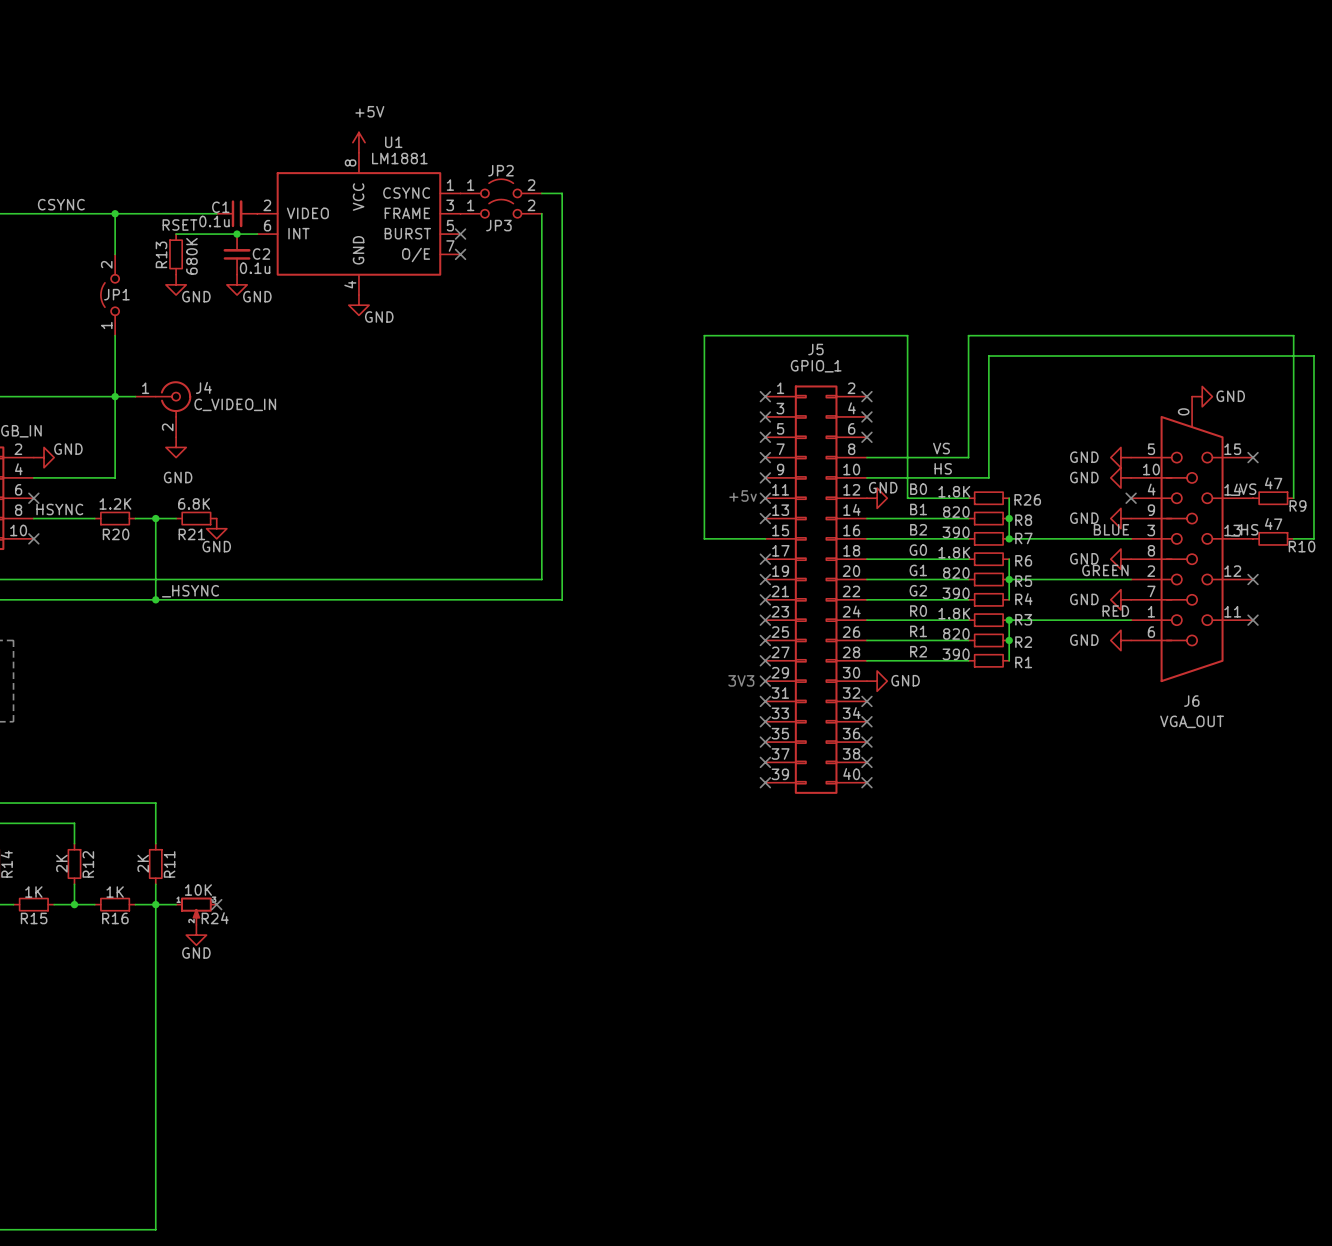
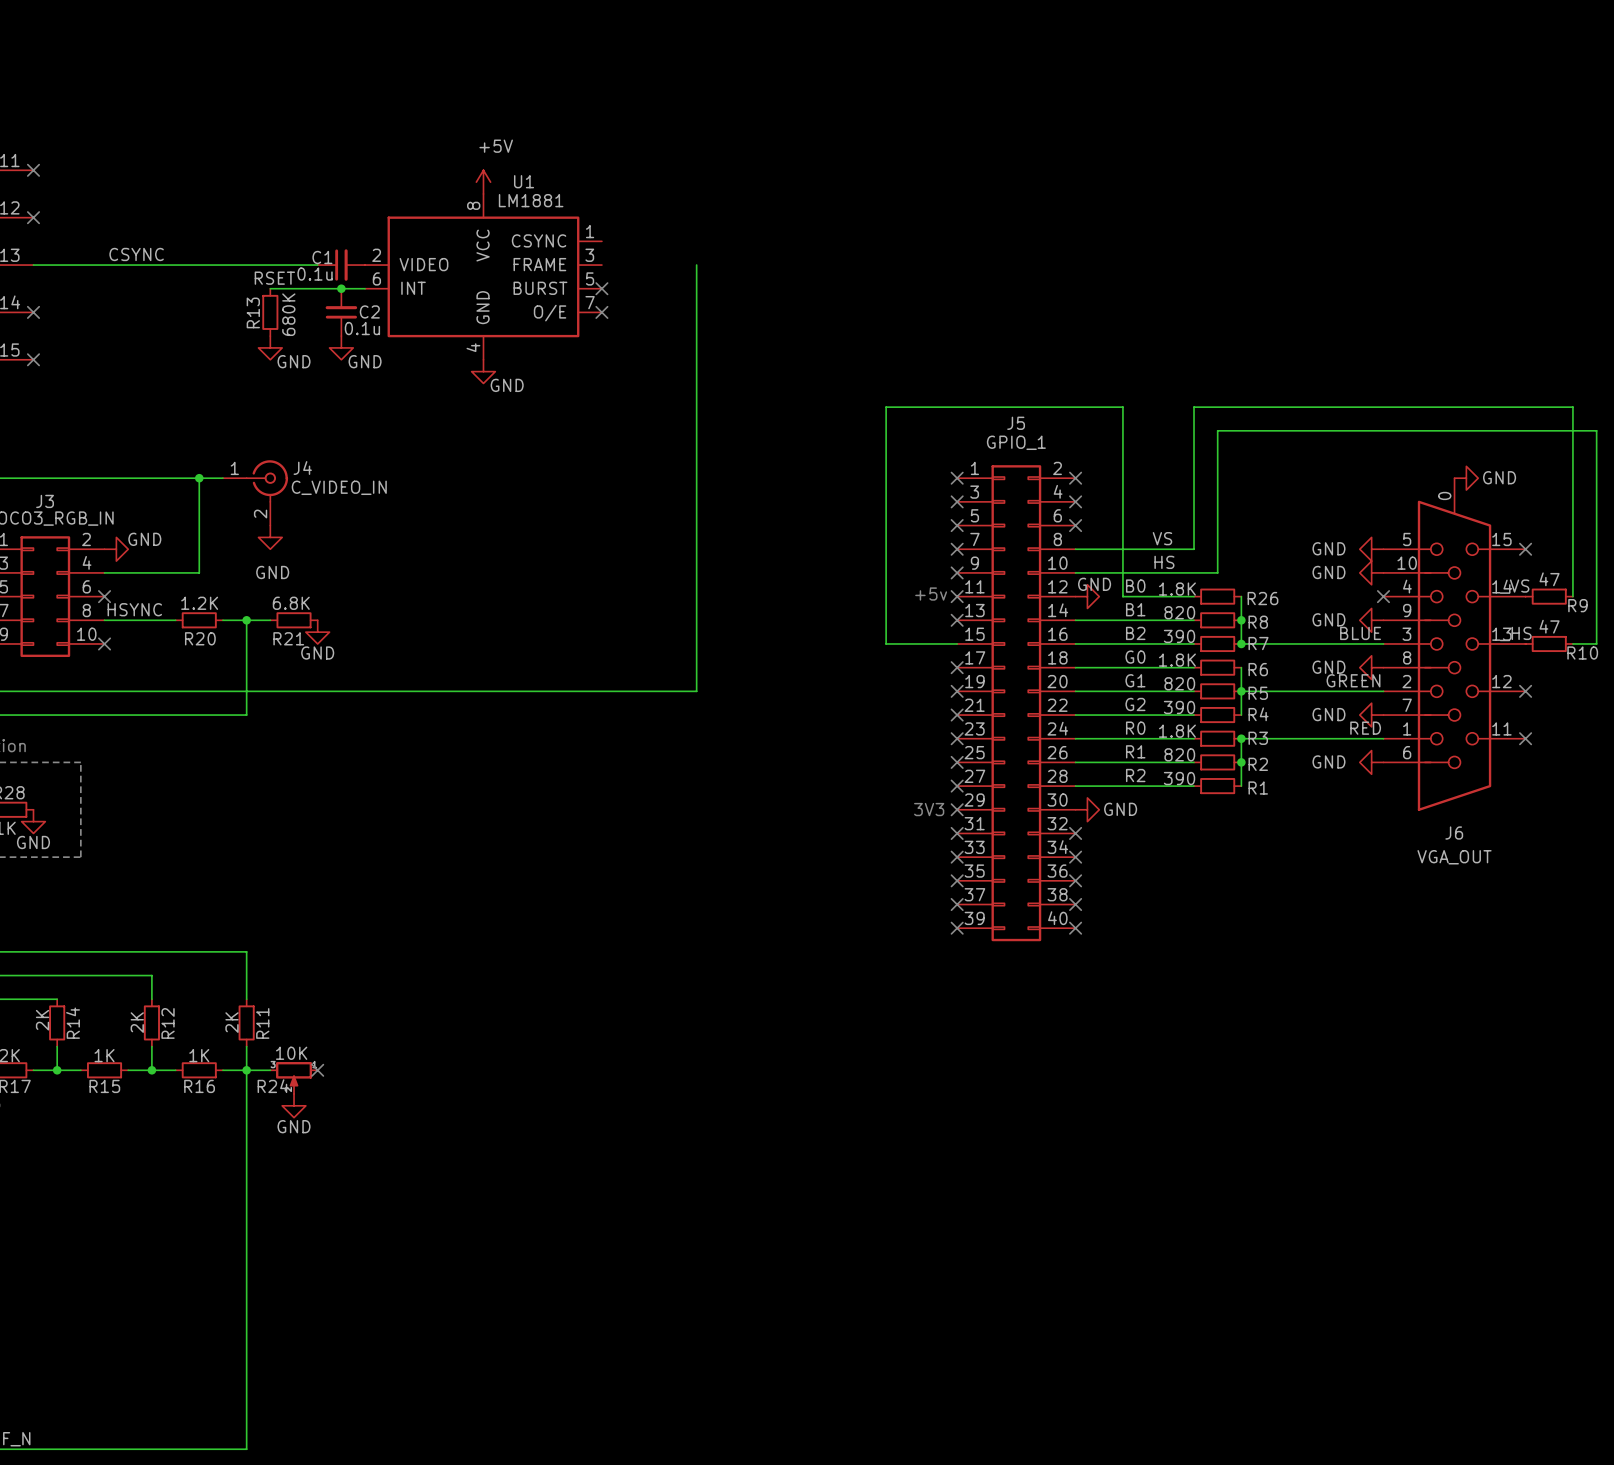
JP2: (501, 188) -> none
wire: (541, 193) (562, 193) (562, 599) (155, 599) -> none
JP3: (501, 208) -> none
wire: (115, 213) (115, 254) -> none
junction: (115, 213) -> none
JP1: (110, 295) -> none
wire: (115, 335) (115, 396) -> none
label: _HSYNC (190, 591) -> none
junction: (155, 599) -> none
R24 flip: as is (196, 907) -> left-right (294, 1073)

